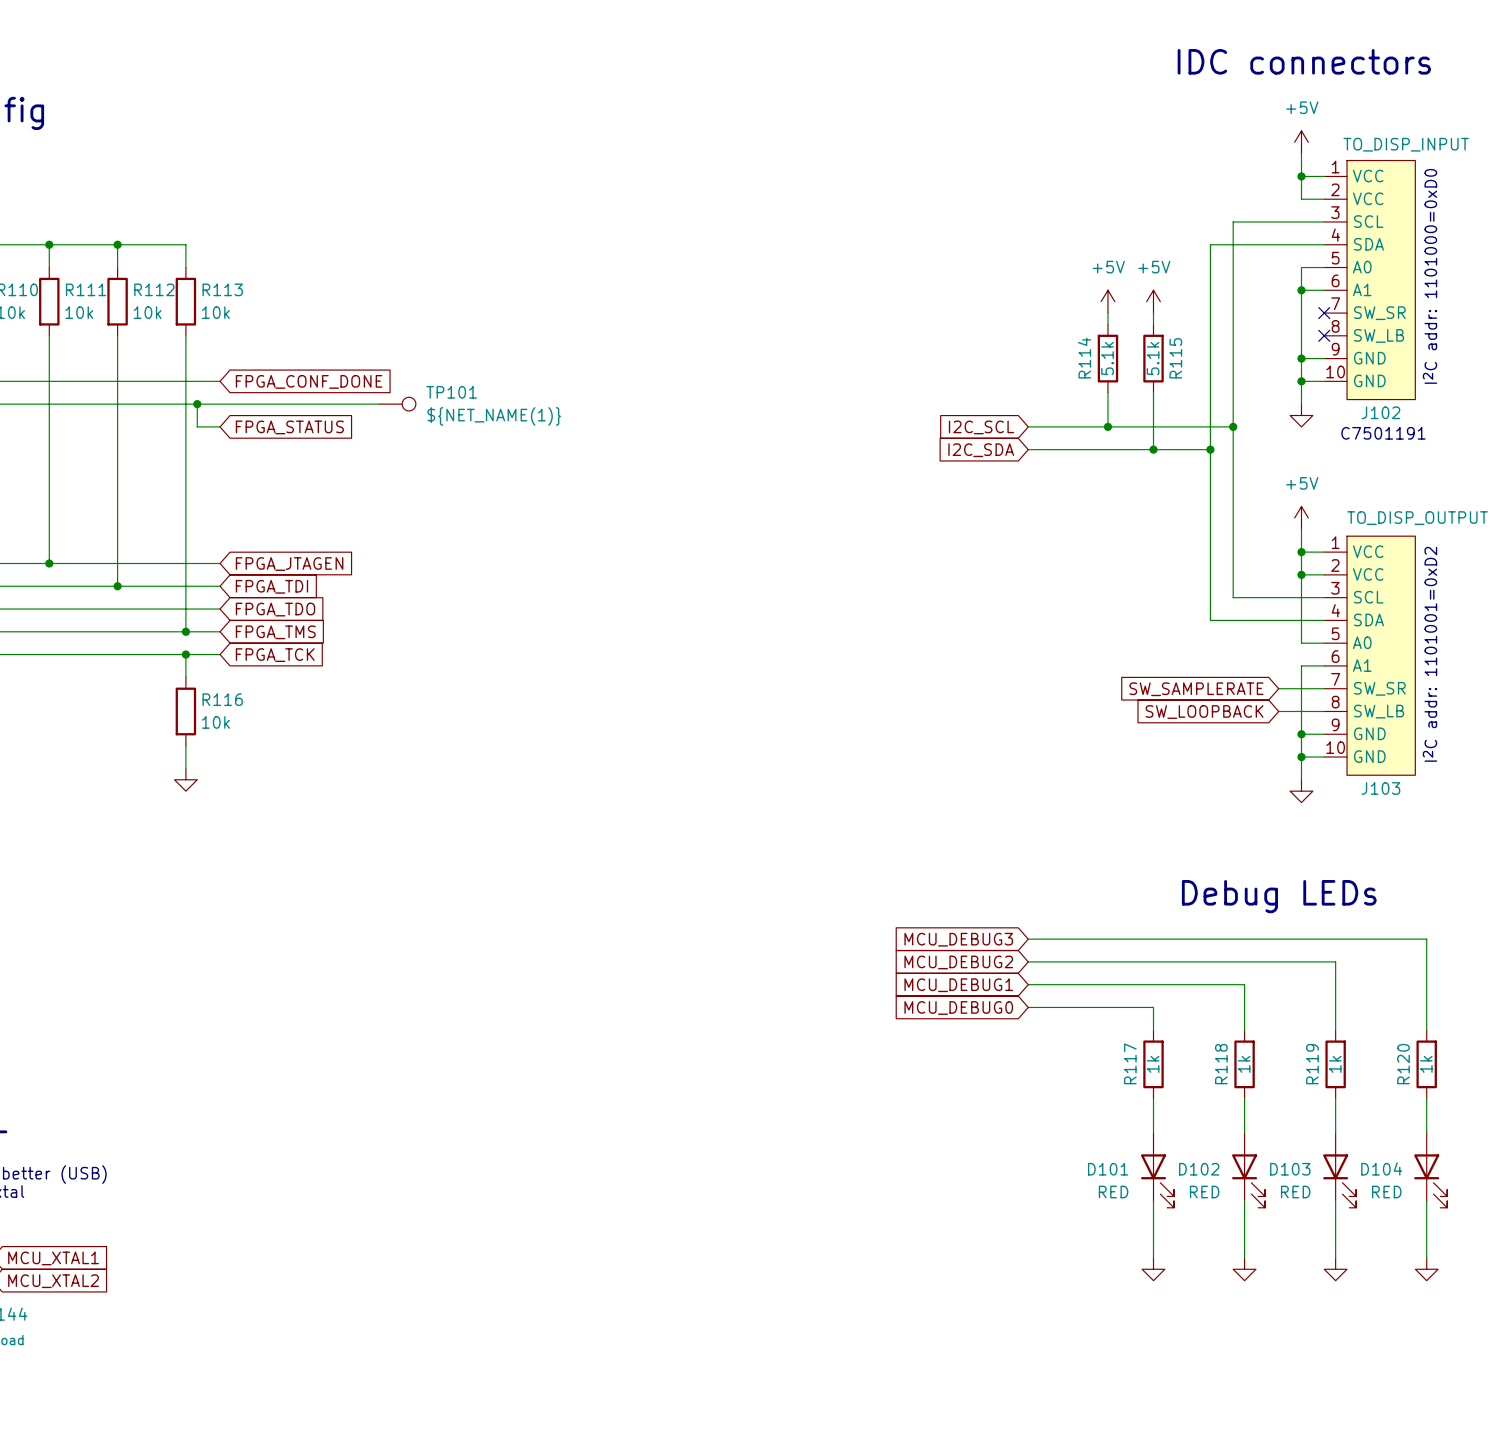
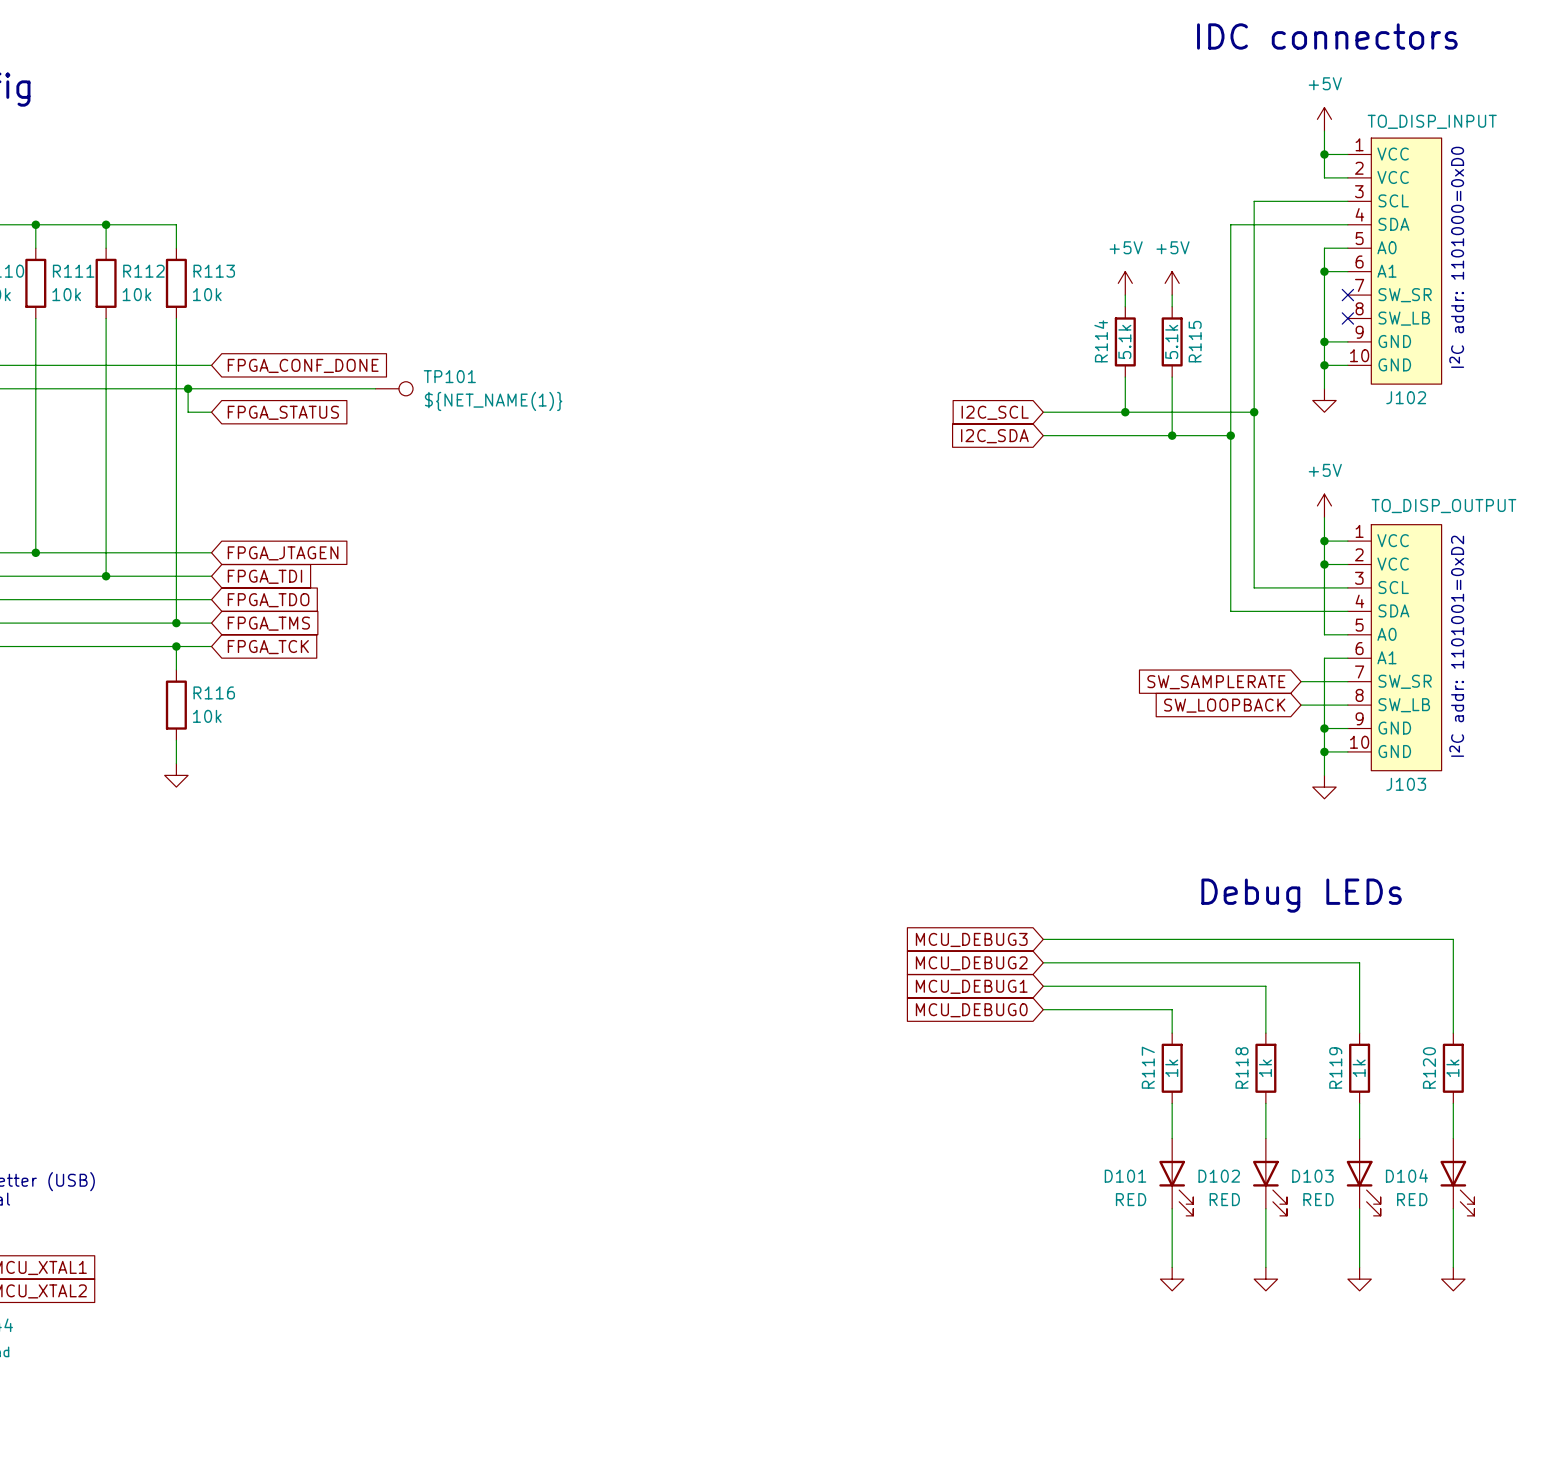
text: C7501191 (1383, 433) -> none

